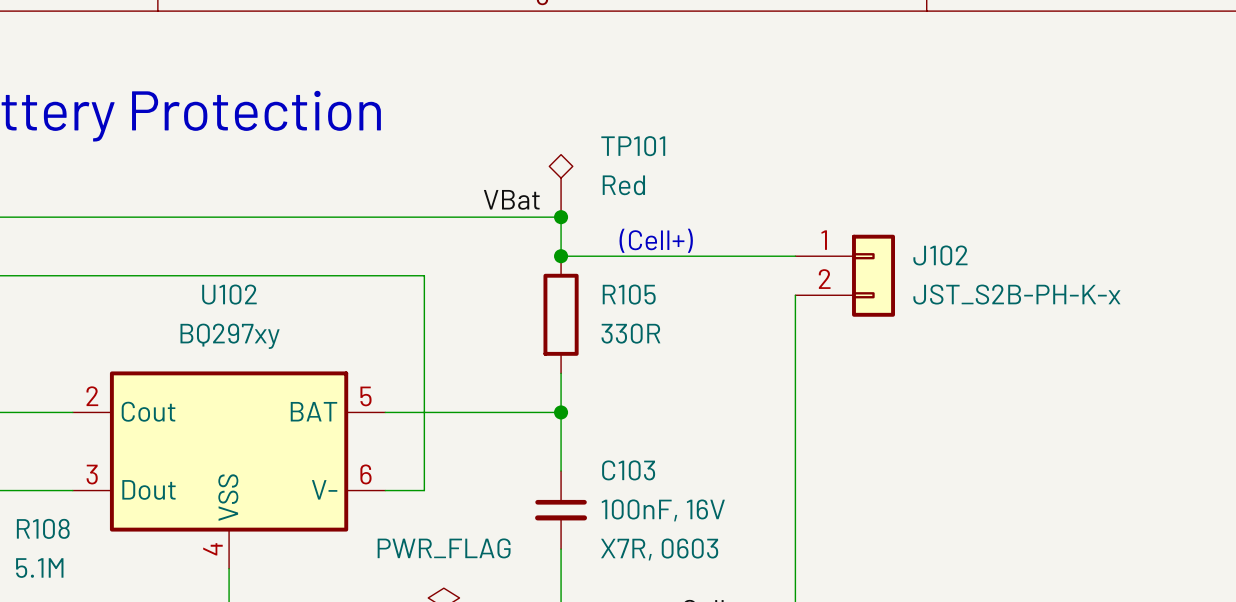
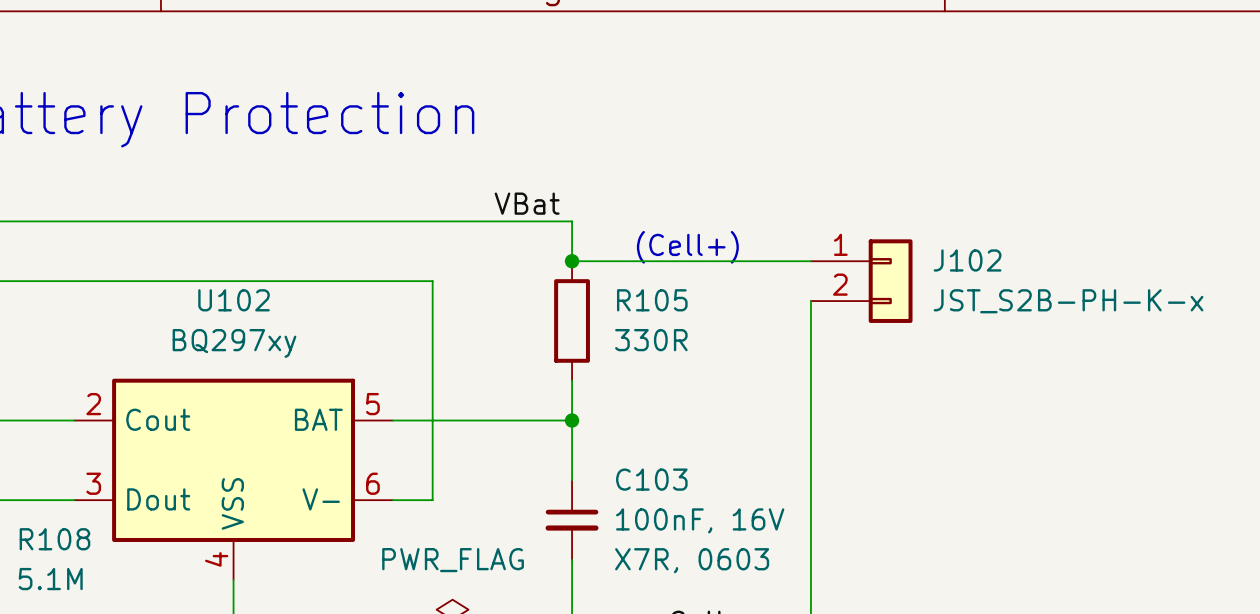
TP101: (561, 185) -> none
junction: (561, 217) -> none

